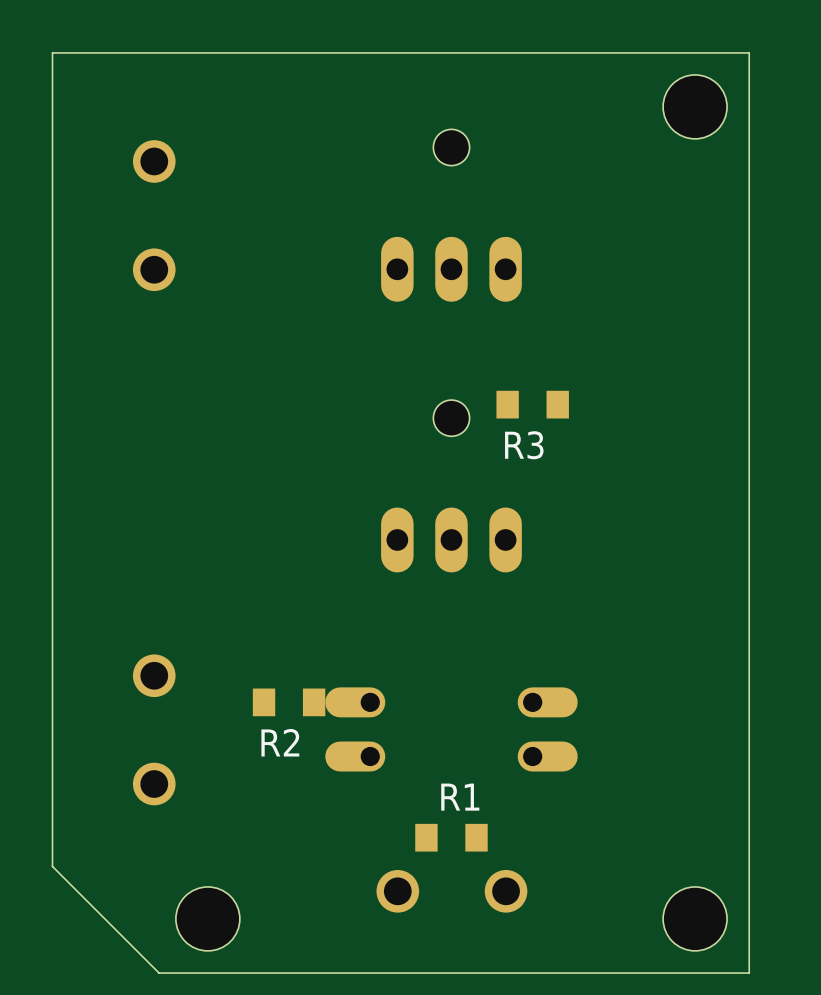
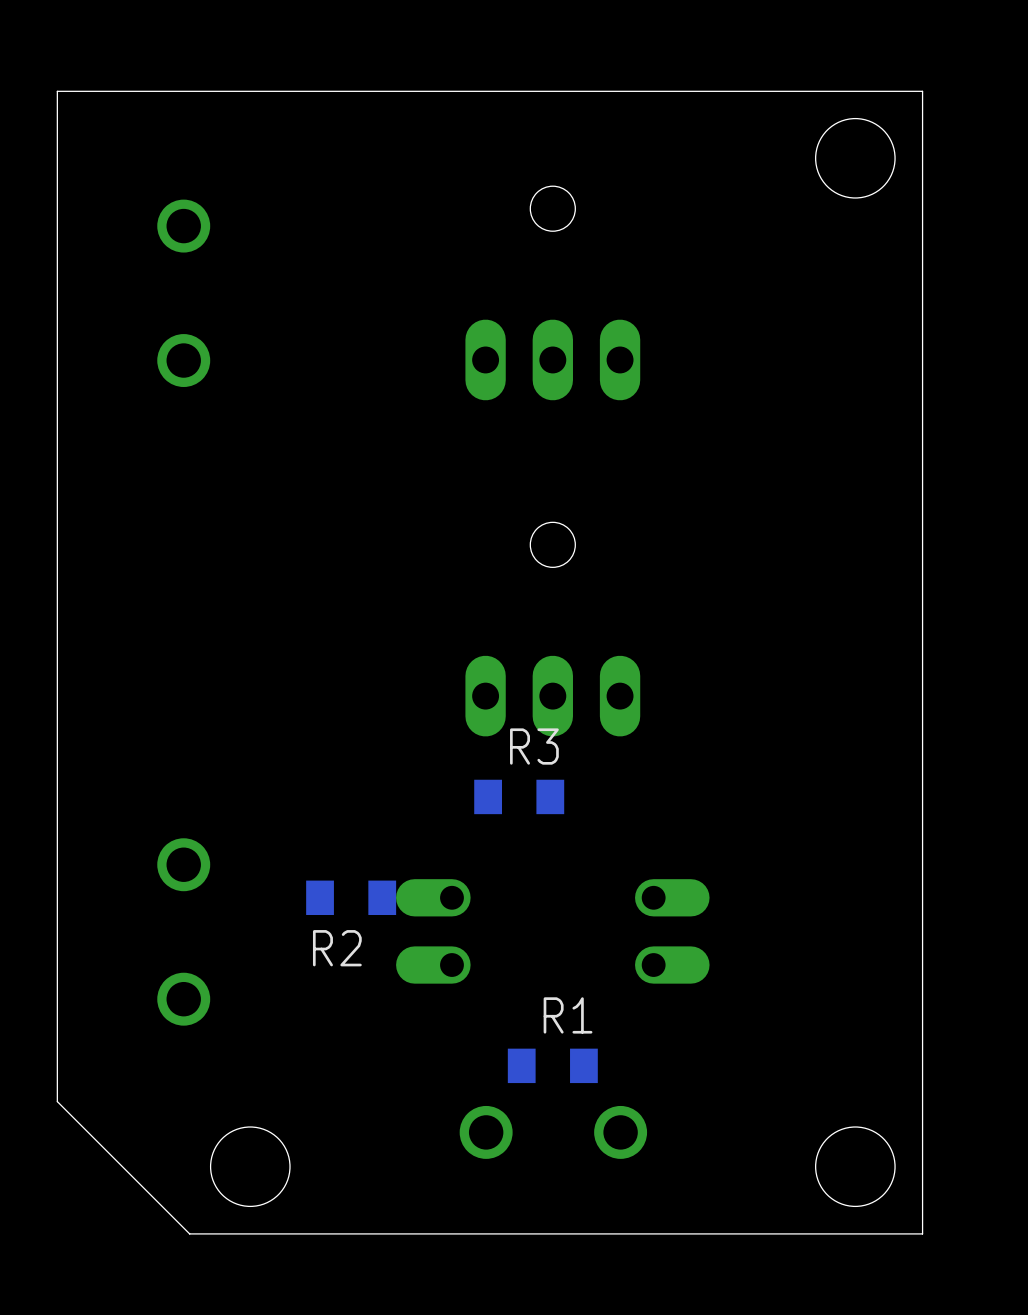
R3 position: (532, 404) -> (519, 796)
R3 name position: R3 (524, 445) -> R3 (534, 746)

